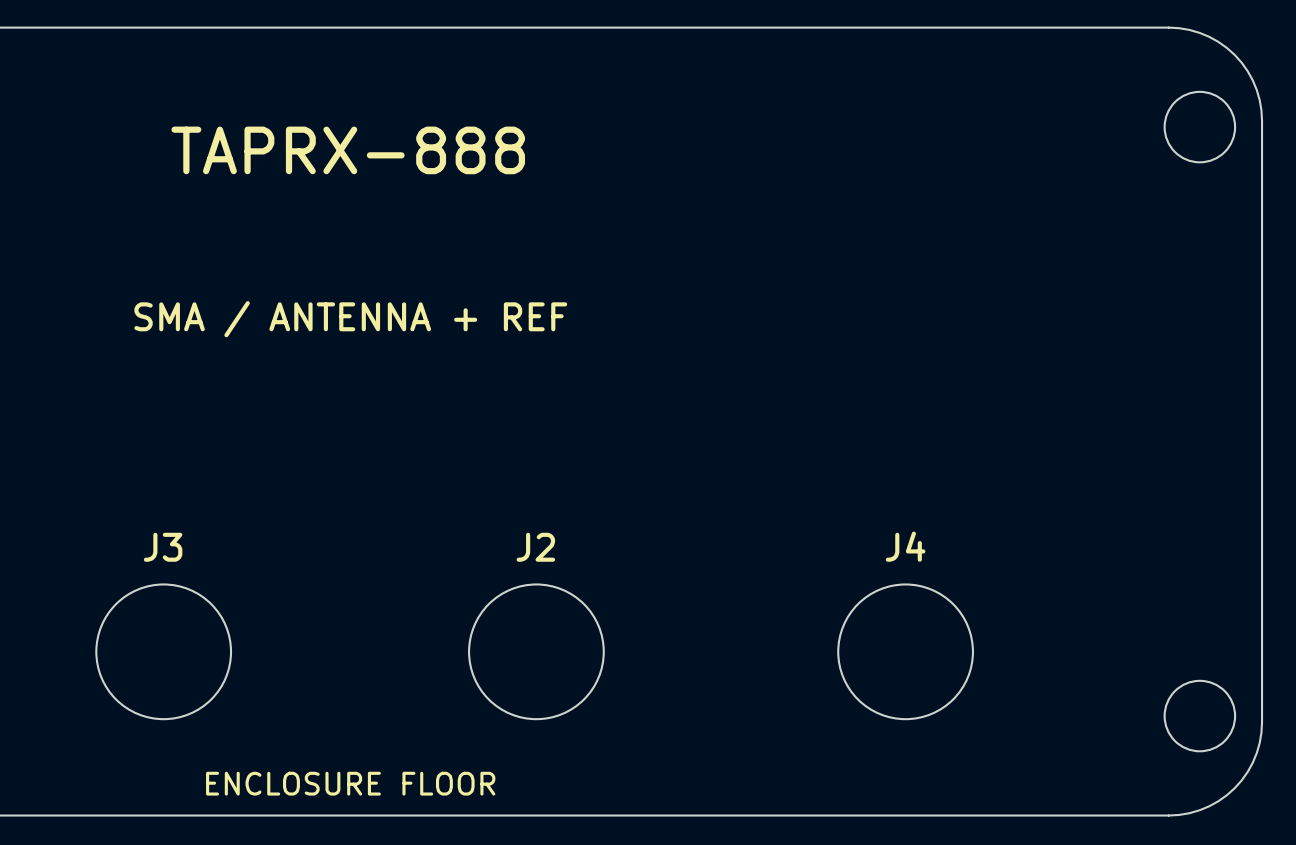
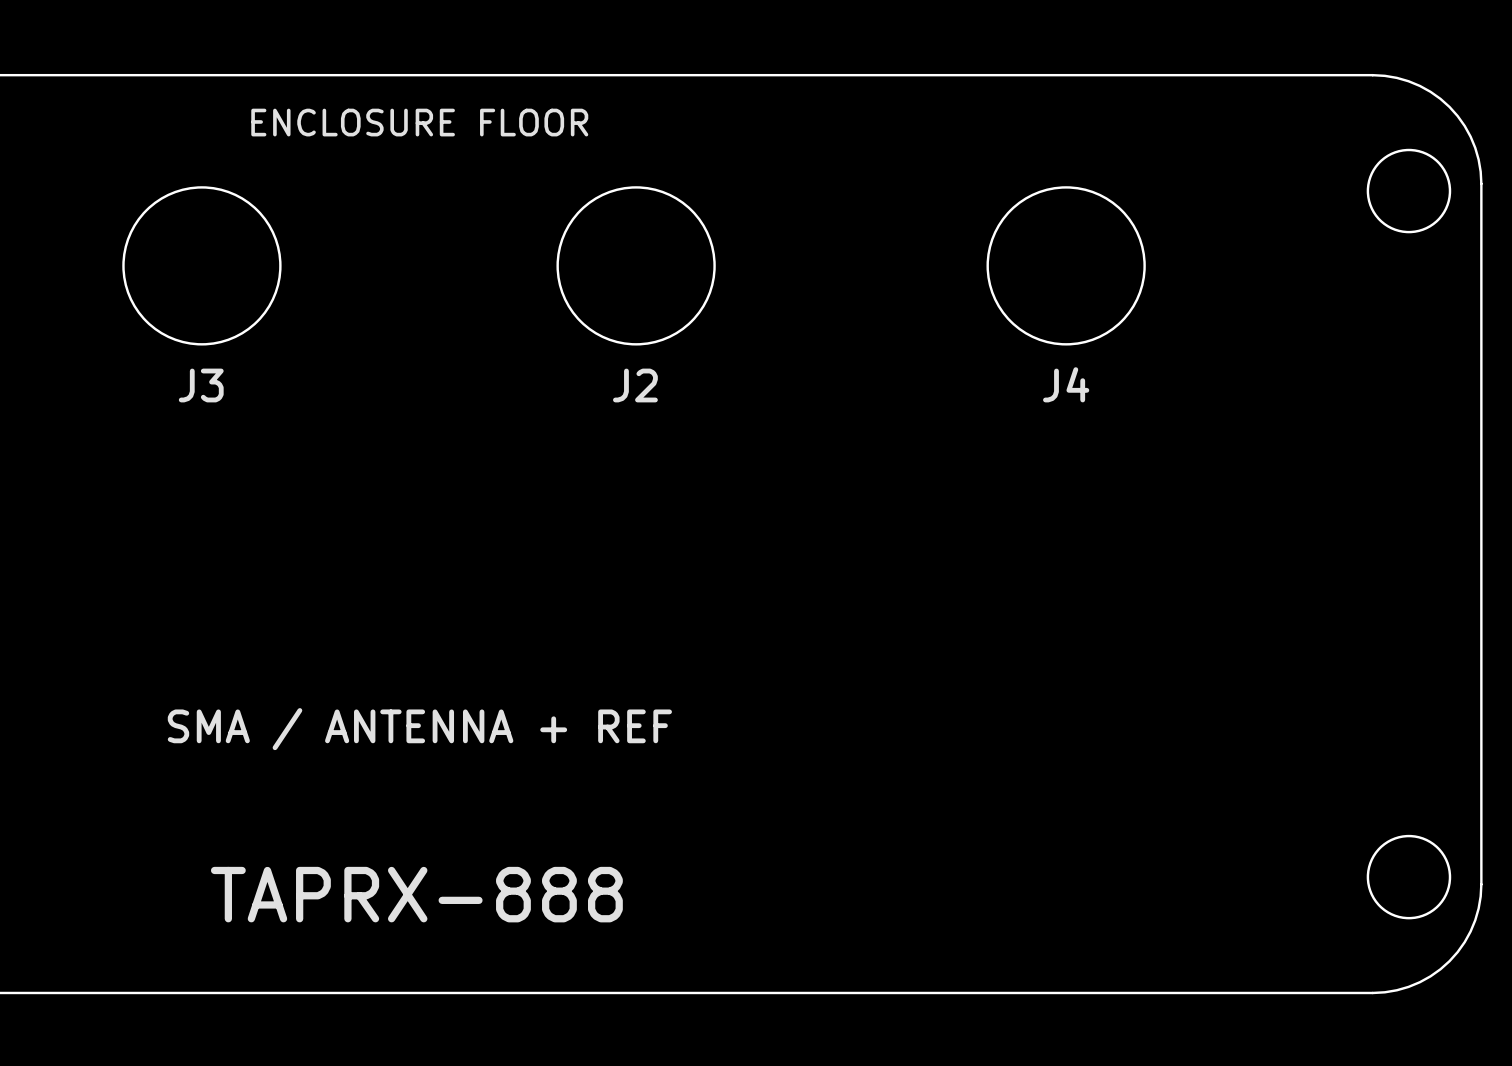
text: none -> ENCLOSURE FLOOR (419, 122)
round board edge: none -> [122, 186, 282, 346]
round board edge: none -> [556, 186, 716, 346]
round board edge: none -> [986, 186, 1146, 346]
text: TAPRX-888 (348, 150) -> none
text position: SMA / ANTENNA + REF (350, 319) -> SMA / ANTENNA + REF (419, 729)
text position: J4 (905, 546) -> J4 (1066, 384)
text position: J3 (163, 547) -> J3 (201, 385)
text position: J2 (535, 547) -> J2 (635, 385)
round board edge: [95, 583, 233, 721] -> none
round board edge: [468, 583, 605, 721] -> none
round board edge: [837, 583, 974, 721] -> none
text: none -> TAPRX-888 (416, 894)
text: ENCLOSURE FLOOR (350, 783) -> none

